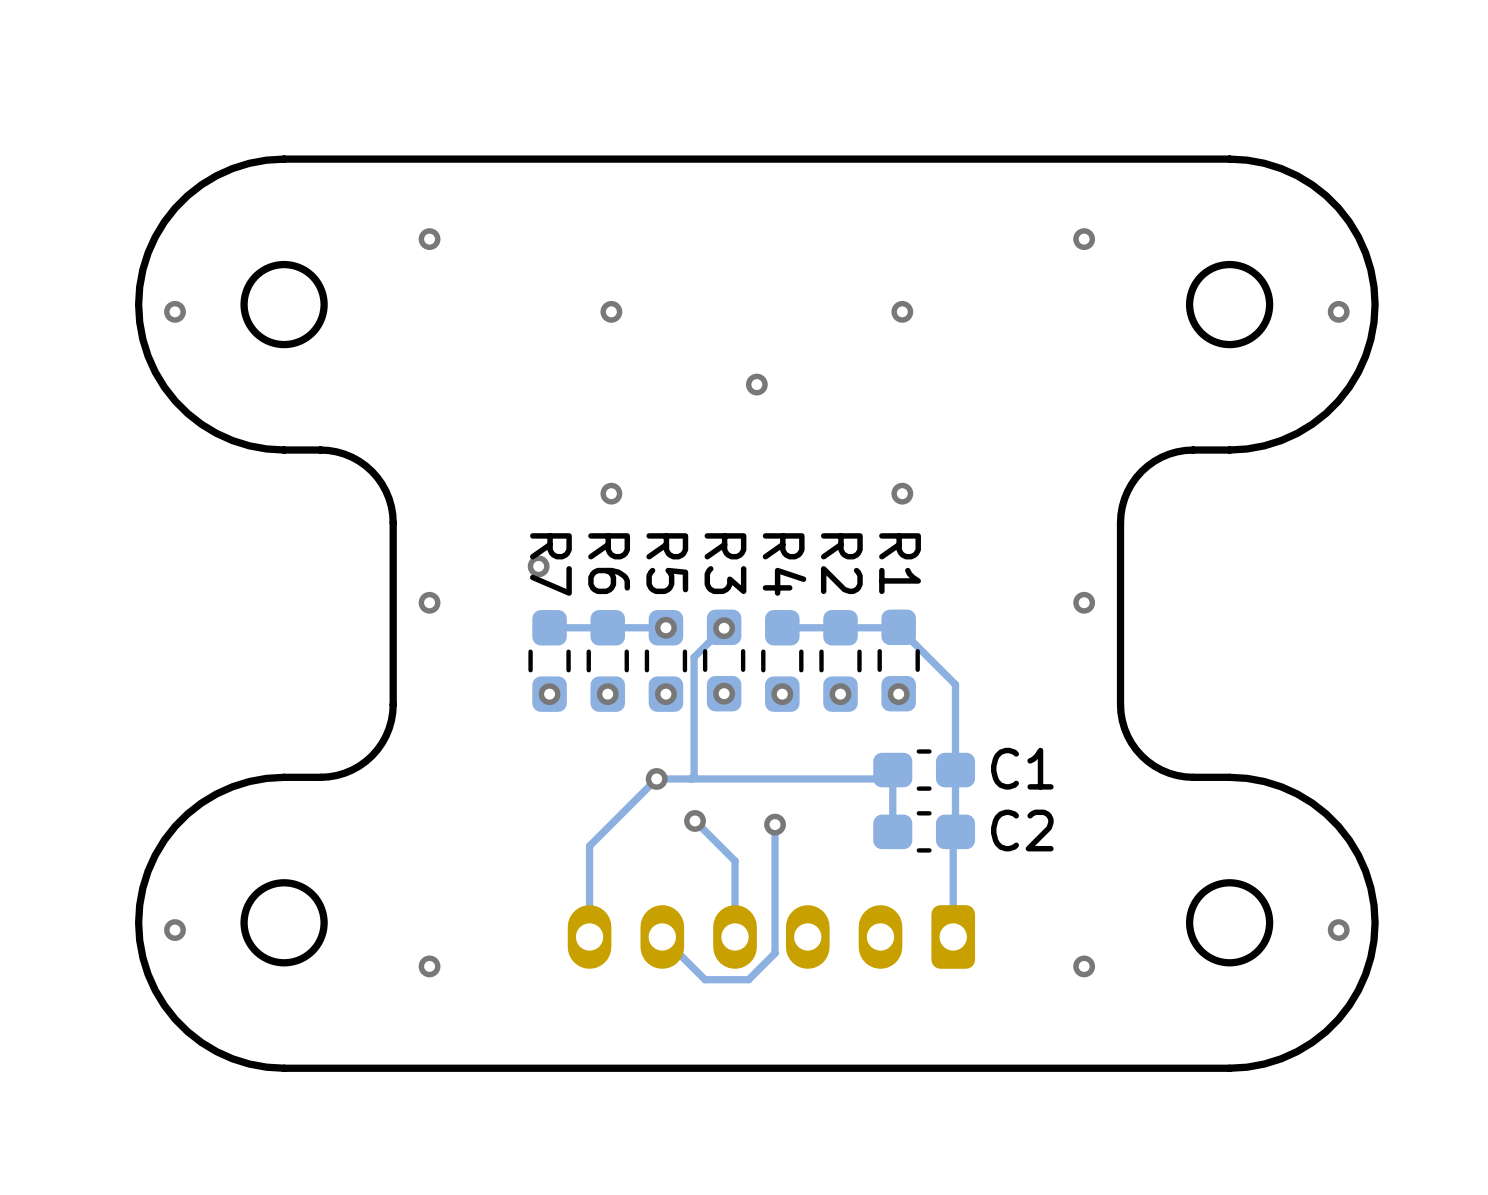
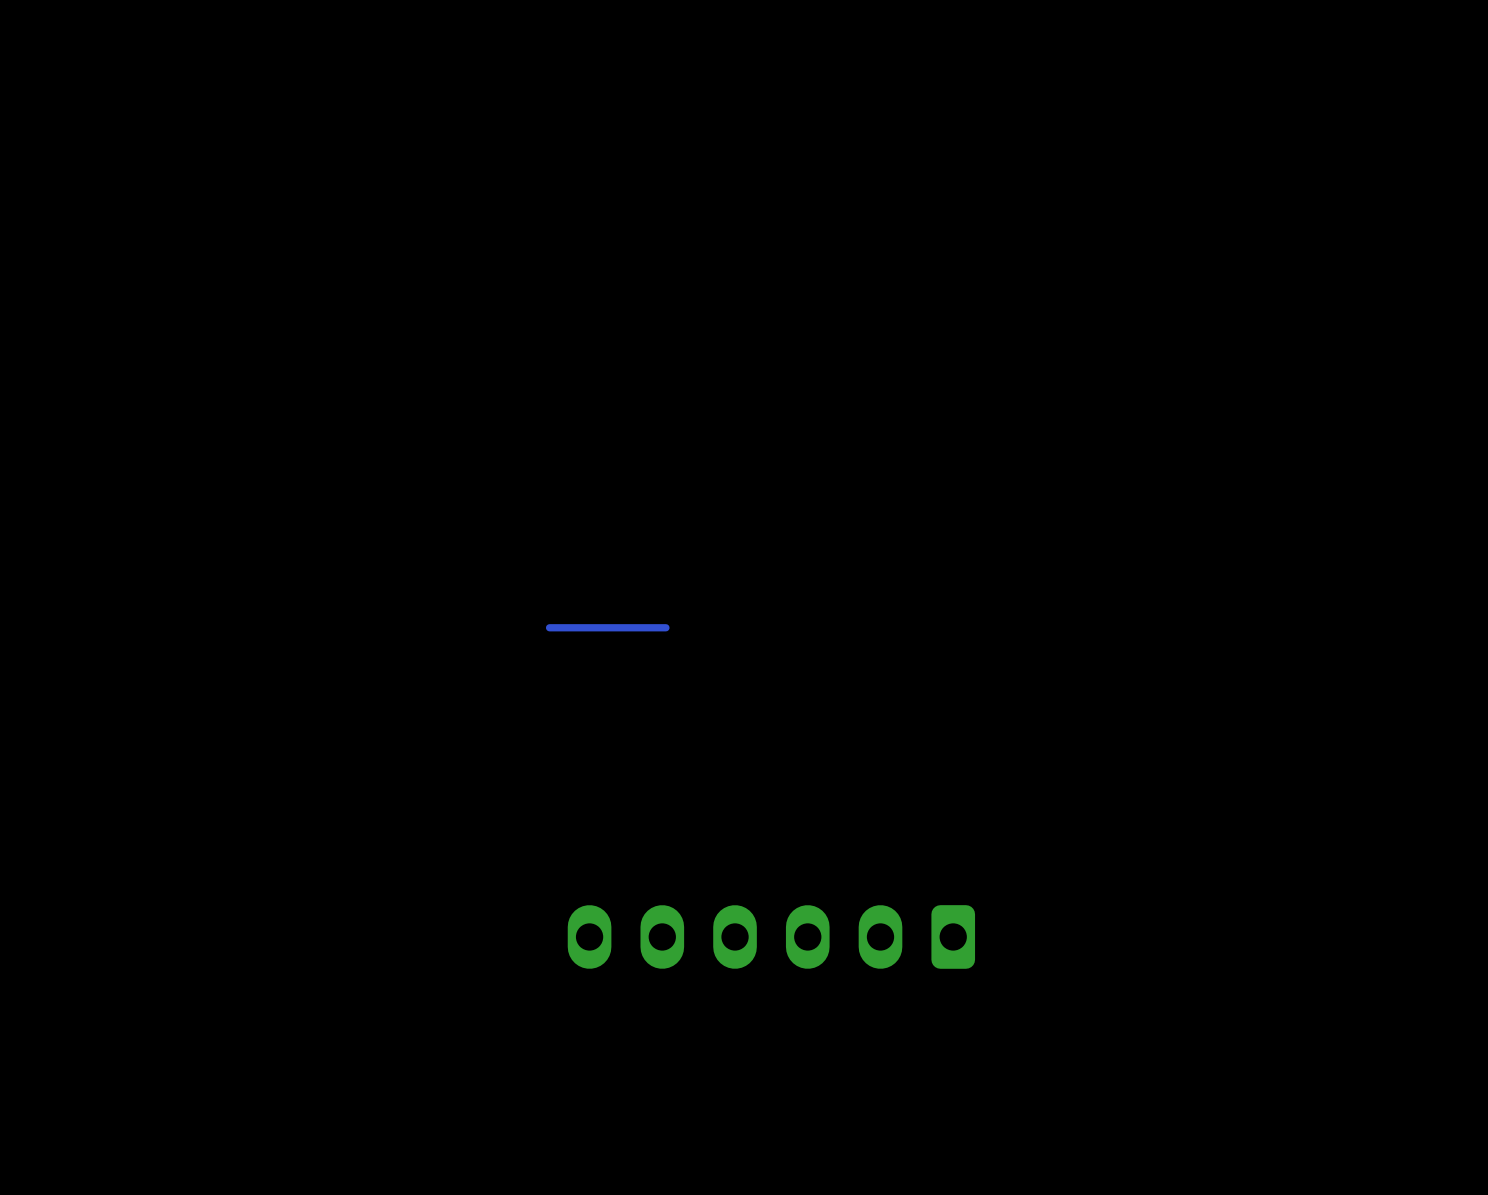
board edge: (1229, 159) (284, 159) (249, 163) (232, 168) (216, 175) (187, 195) (164, 221) (155, 236) (142, 269) (139, 287) (139, 322) (148, 356) (164, 387) (175, 401) (187, 413) (216, 433) (249, 445) (266, 448) (328, 450) (344, 454) (365, 465) (382, 484) (391, 506) (393, 522) (393, 704) (389, 728) (382, 743) (371, 756) (359, 766) (344, 773) (328, 776) (266, 778) (232, 786) (201, 803) (175, 826) (164, 840) (148, 871) (142, 887) (139, 905) (139, 940) (148, 974) (164, 1005) (175, 1019) (201, 1042) (232, 1058) (266, 1067) (284, 1068) (1229, 1068) (1247, 1067) (1281, 1058) (1297, 1051) (1326, 1031) (1349, 1005) (1358, 990) (1365, 974) (1374, 940) (1375, 922) (1370, 887) (1365, 871) (1349, 840) (1338, 826) (1312, 803) (1281, 786) (1247, 778) (1185, 776) (1169, 773) (1154, 766) (1141, 756) (1131, 743) (1124, 728) (1120, 712) (1120, 522) (1122, 506) (1131, 484) (1147, 465) (1169, 454) (1185, 450) (1229, 450) (1264, 445) (1297, 433) (1312, 424) (1338, 401) (1349, 387) (1365, 356) (1370, 339) (1375, 304) (1370, 269) (1358, 236) (1338, 208) (1312, 184) (1281, 168) (1247, 160) (1229, 159) -> none
via: (429, 239) -> none
via: (1084, 239) -> none
round board edge: [240, 260, 328, 349] -> none
round board edge: [1185, 260, 1274, 349] -> none
via: (174, 311) -> none
via: (611, 311) -> none
via: (902, 311) -> none
via: (1338, 311) -> none
via: (756, 384) -> none
via: (611, 493) -> none
via: (902, 493) -> none
via: (538, 566) -> none
via: (429, 602) -> none
via: (1084, 602) -> none
via: (665, 627) -> none
track: (782, 627) (898, 627) (955, 684) (953, 936) -> none
track: (724, 628) (694, 657) (694, 776) (691, 778) -> none
via: (724, 628) -> none
R7: (549, 660) -> none
R6: (607, 660) -> none
R5: (665, 660) -> none
R3: (724, 660) -> none
R4: (782, 660) -> none
R2: (840, 660) -> none
R1: (898, 660) -> none
via: (724, 693) -> none
via: (549, 694) -> none
via: (607, 694) -> none
via: (665, 694) -> none
via: (782, 694) -> none
via: (840, 694) -> none
via: (898, 694) -> none
C1: (924, 770) -> none
via: (656, 778) -> none
track: (695, 820) (735, 860) (735, 936) -> none
via: (695, 820) -> none
track: (775, 824) (775, 953) (748, 979) (705, 979) (662, 936) -> none
via: (775, 824) -> none
track: (892, 831) (892, 770) (883, 778) (656, 778) (589, 846) (589, 936) -> none
C2: (924, 831) -> none
round board edge: [240, 879, 328, 967] -> none
round board edge: [1185, 879, 1274, 967] -> none
via: (174, 930) -> none
via: (1338, 930) -> none
via: (429, 966) -> none
via: (1084, 966) -> none

